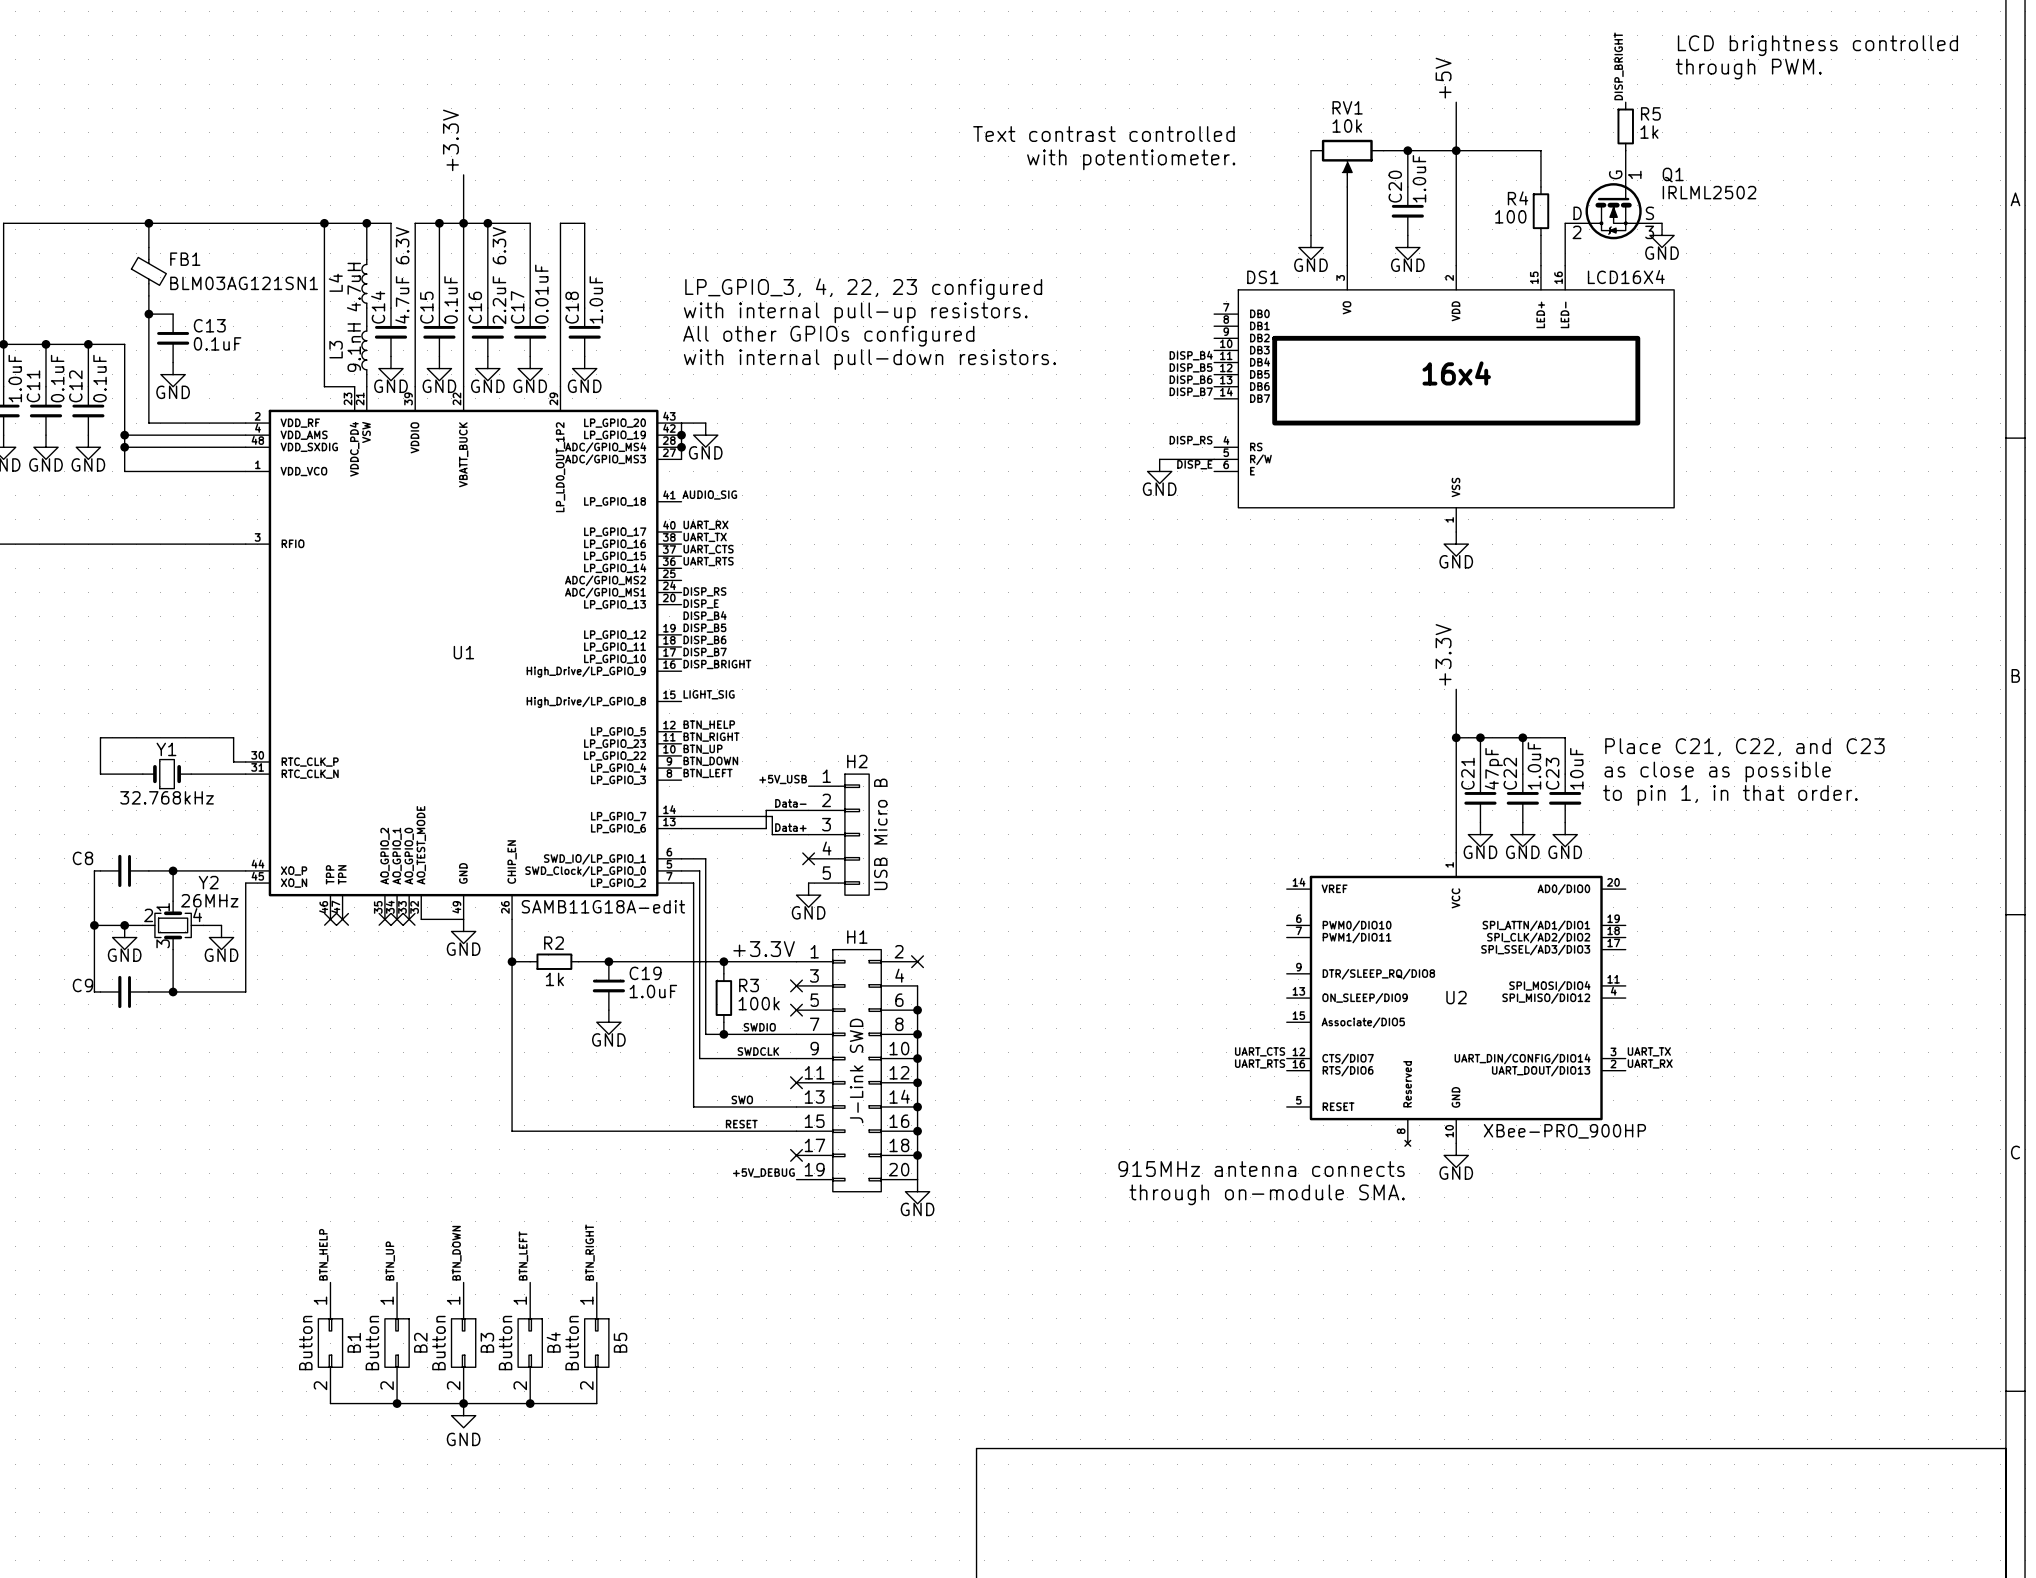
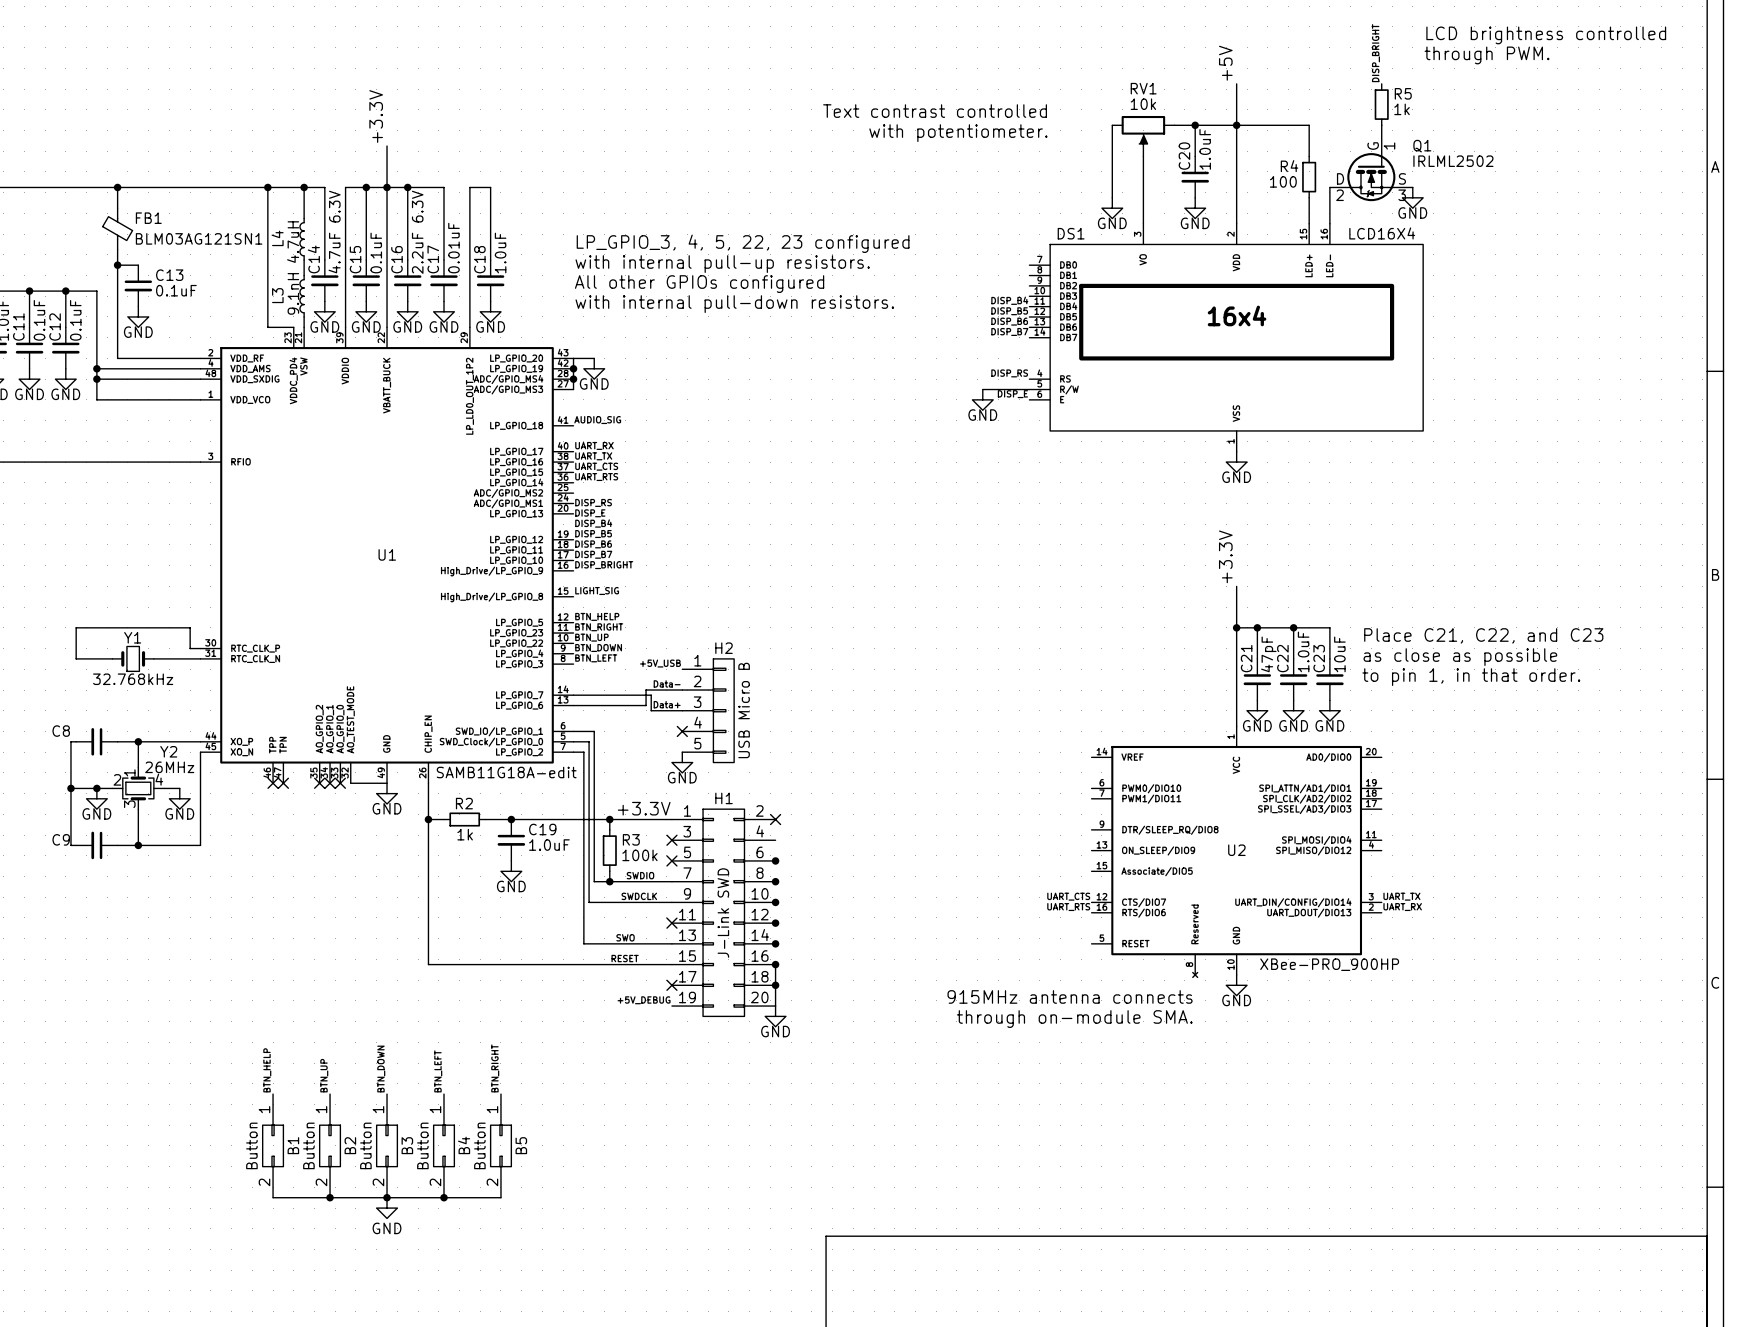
text: LP_GPIO_3, 4, 22, 23 configured (863, 289) -> LP_GPIO_3, 4, 5, 22, 23 configured (743, 243)
wire: (917, 985) (917, 1131) -> none

